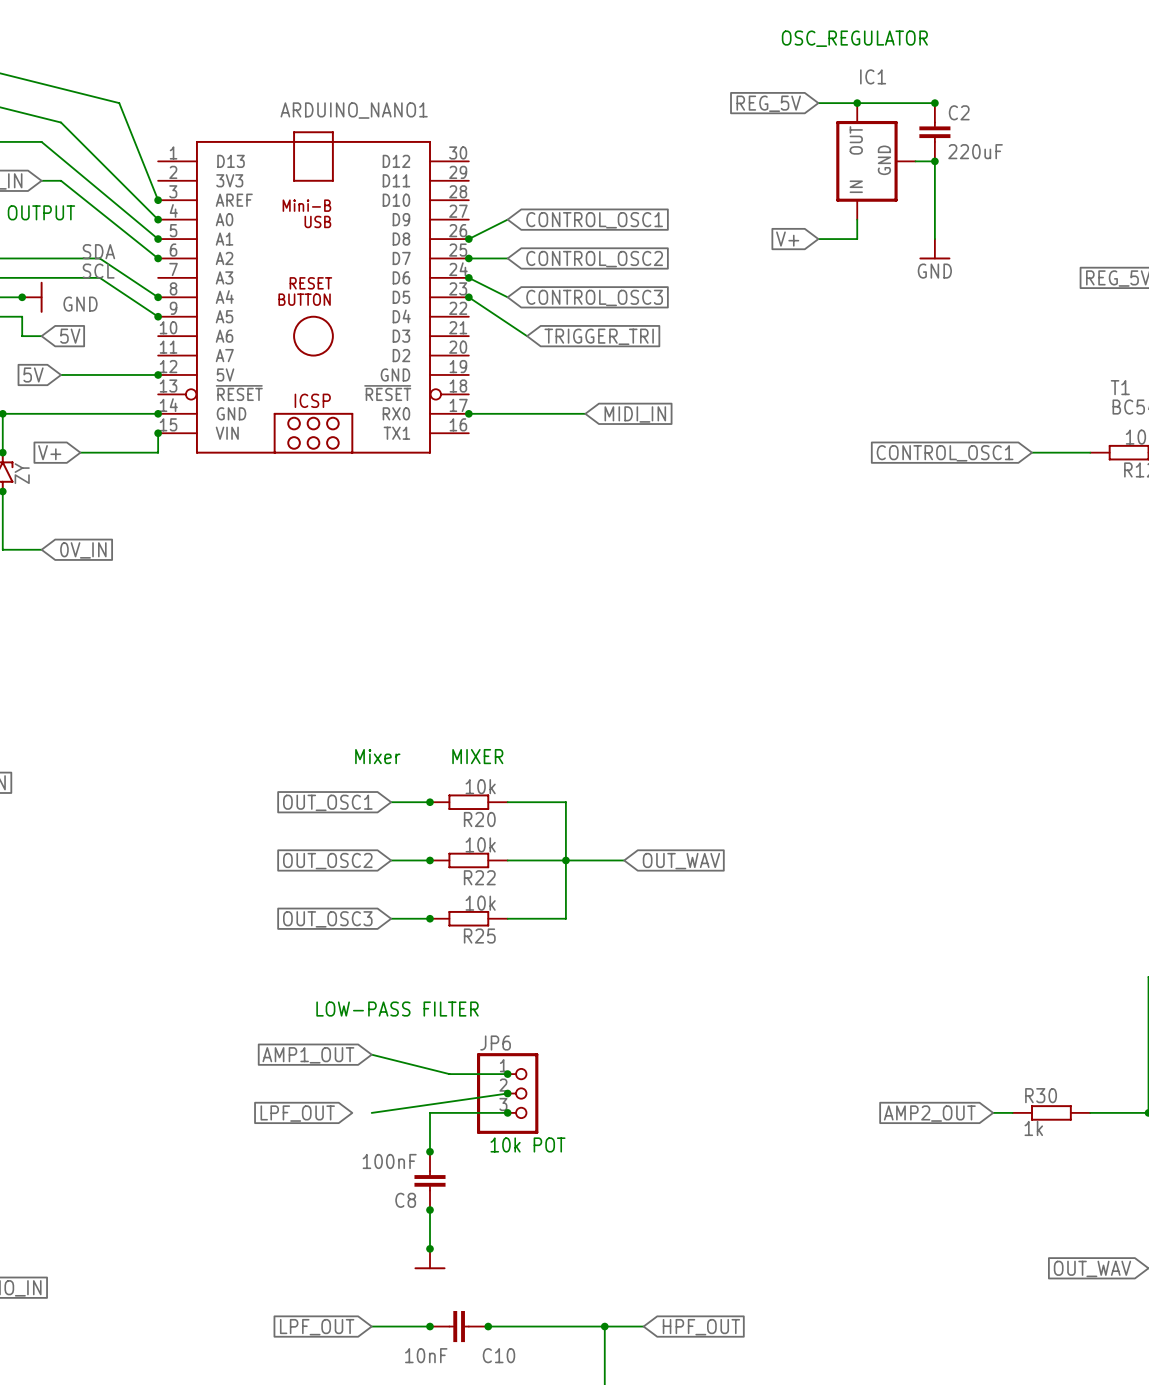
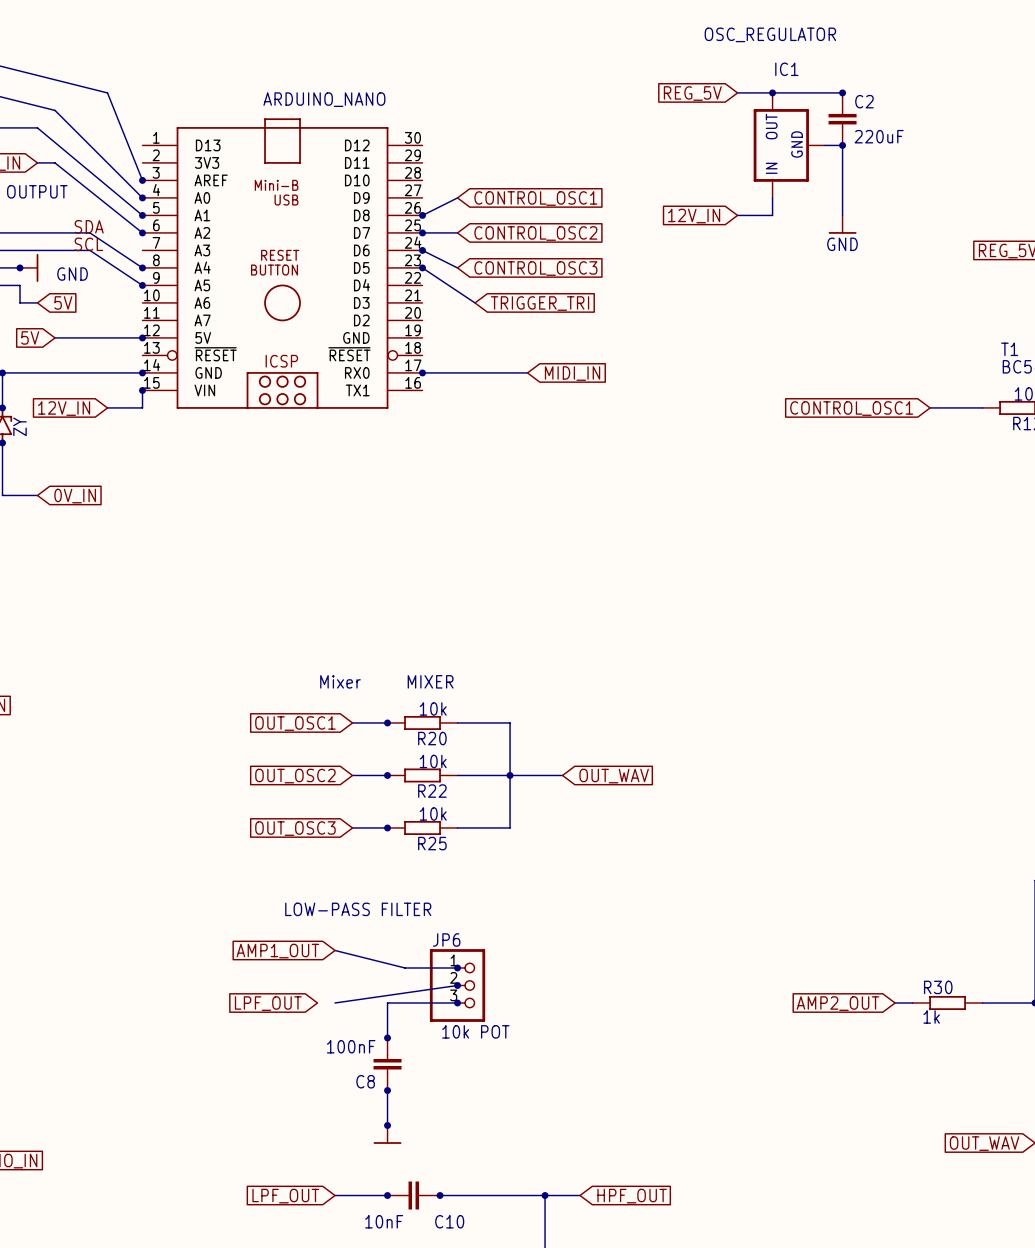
ARDUINO_NANO1 name: ARDUINO_NANO1 (354, 110) -> ARDUINO_NANO (324, 99)
global label: V+ (787, 239) -> 12V_IN (694, 216)
global label: V+ (49, 452) -> none
wire: (80, 452) (119, 452) -> none
global label: none -> 12V_IN (64, 408)

